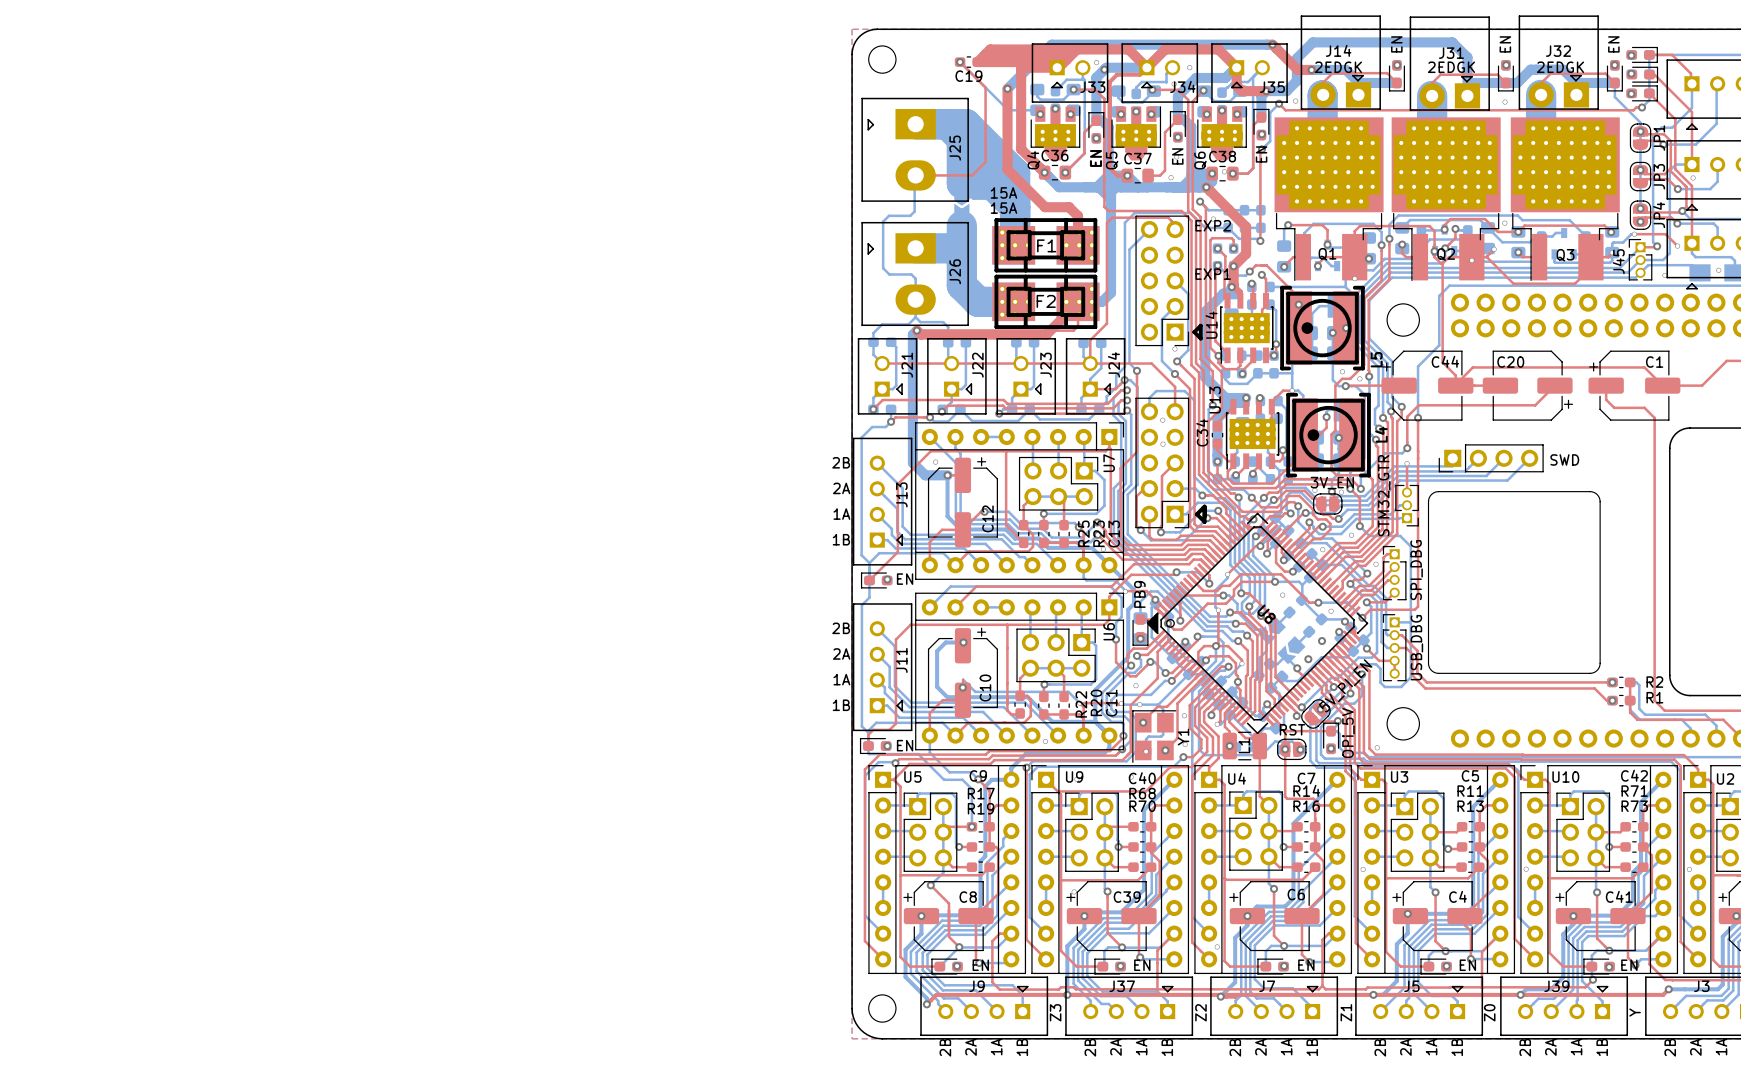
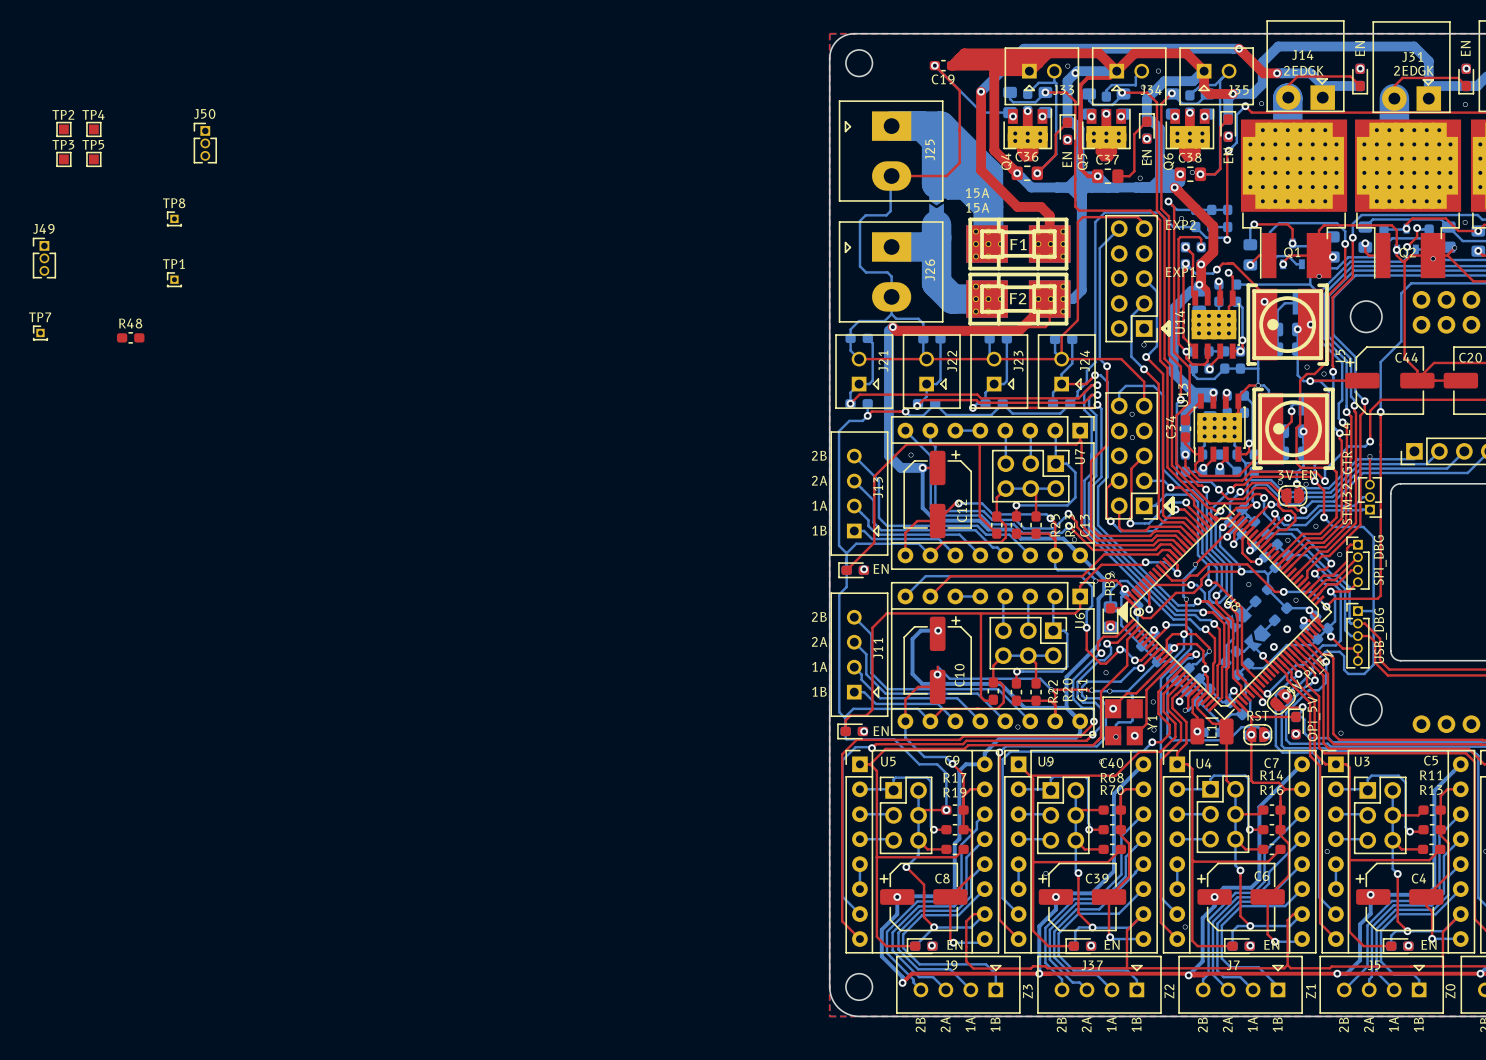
TP2: none -> (63, 129)
TP4: none -> (93, 129)
J50: none -> (205, 143)
TP3: none -> (63, 159)
TP5: none -> (93, 159)
TP8: none -> (174, 218)
J49: none -> (44, 258)
TP1: none -> (174, 279)
TP7: none -> (40, 332)
R48: none -> (130, 337)

